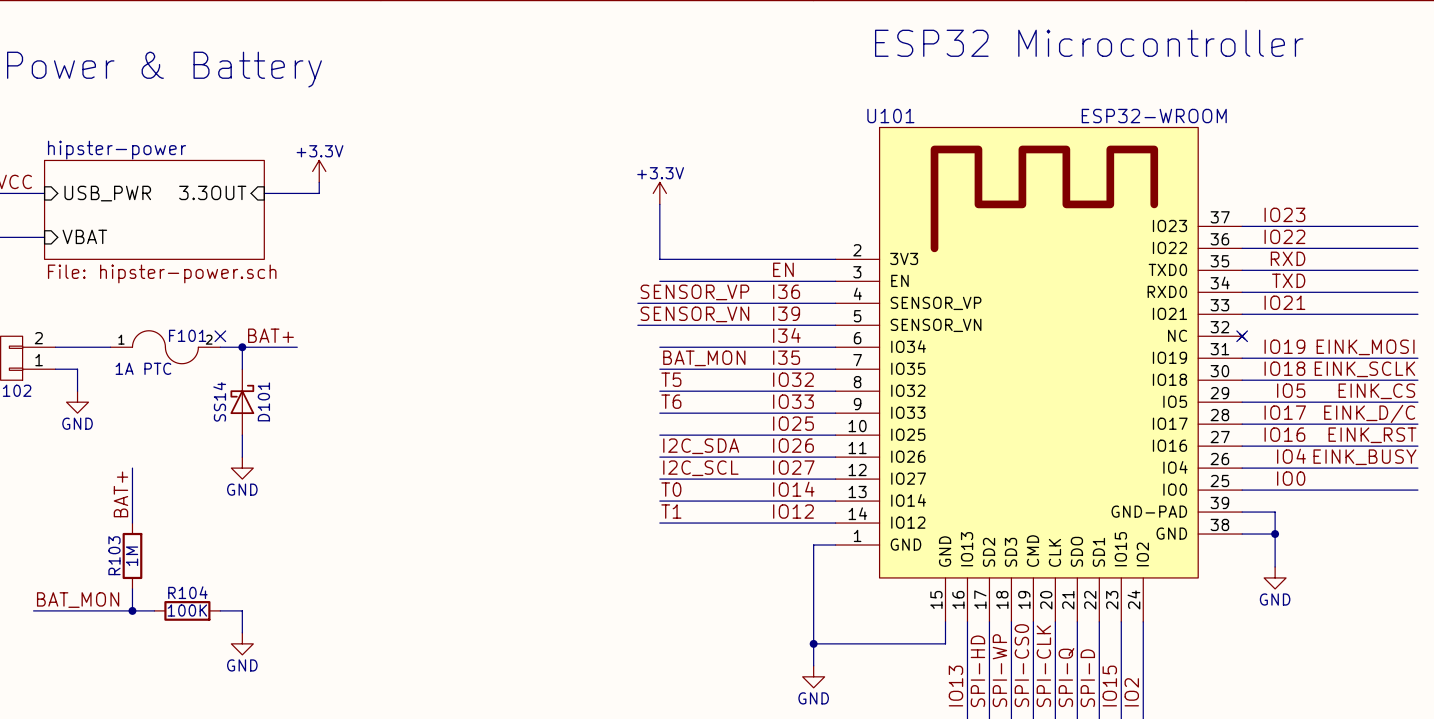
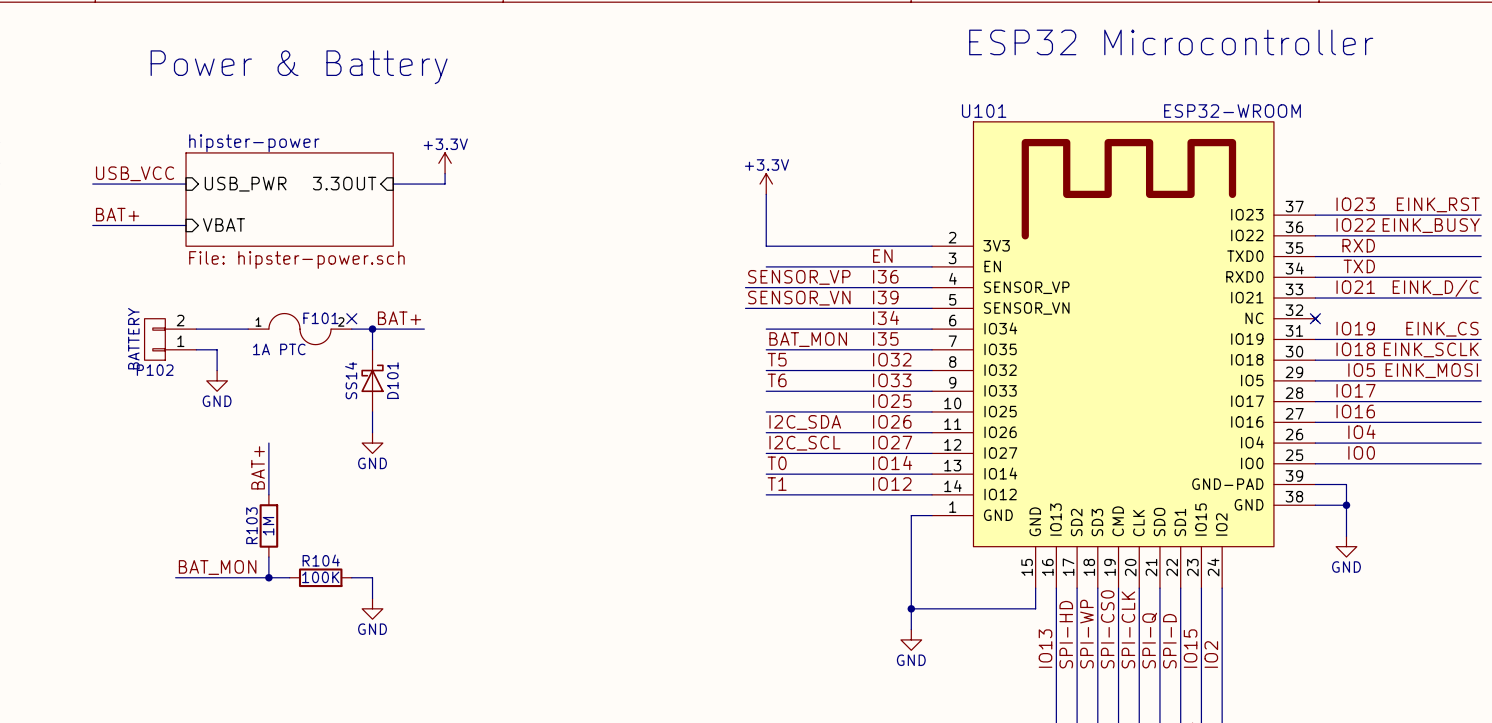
label: none -> EINK_RST (1438, 204)
label: none -> EINK_BUSY (1431, 225)
label: EINK_MOSI (1365, 347) -> EINK_CS (1442, 329)
label: EINK_CS (1376, 391) -> EINK_MOSI (1431, 370)
label position: EINK_D/C (1369, 413) -> EINK_D/C (1435, 288)
label: EINK_RST (1372, 435) -> none
label: EINK_BUSY (1364, 457) -> none

